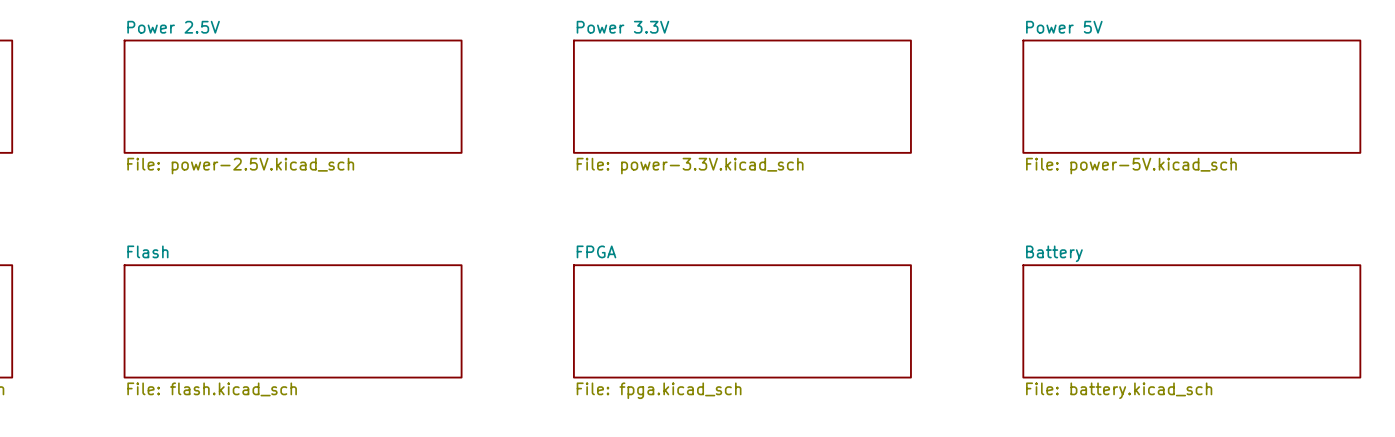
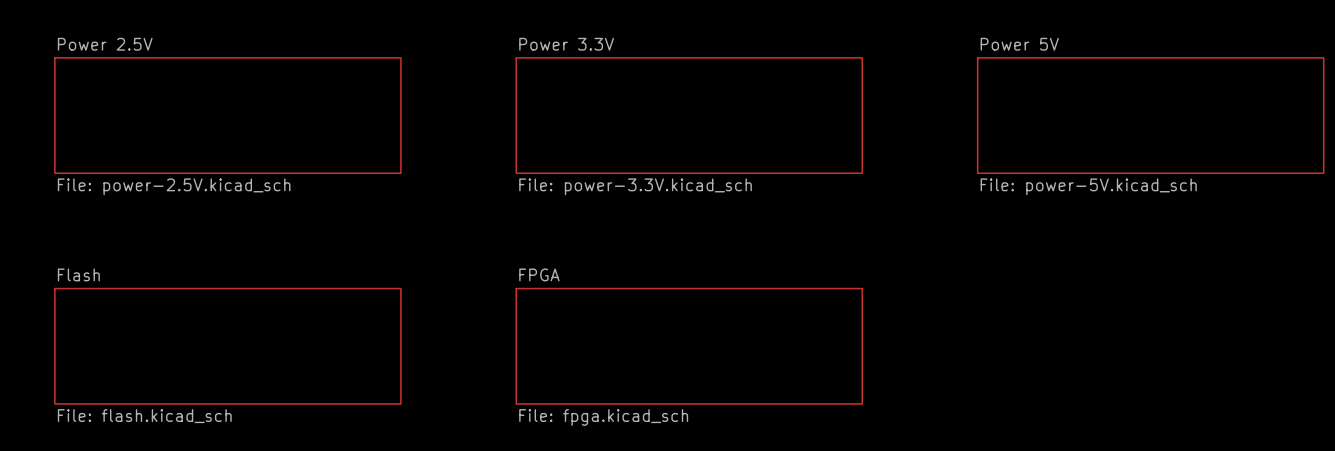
sheet Battery: File: battery.kicad_sch (1191, 321) -> none

